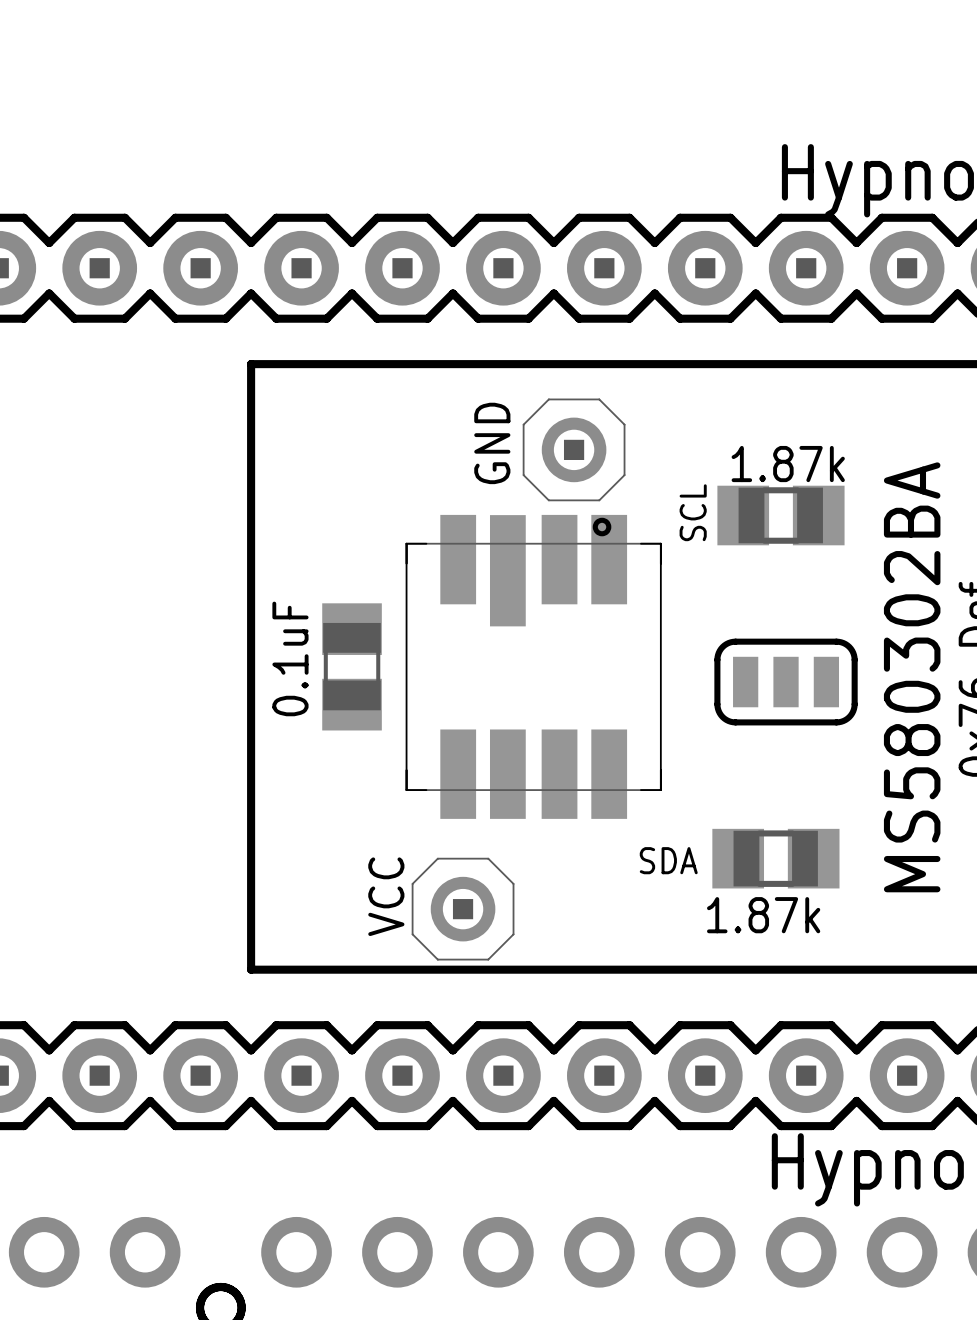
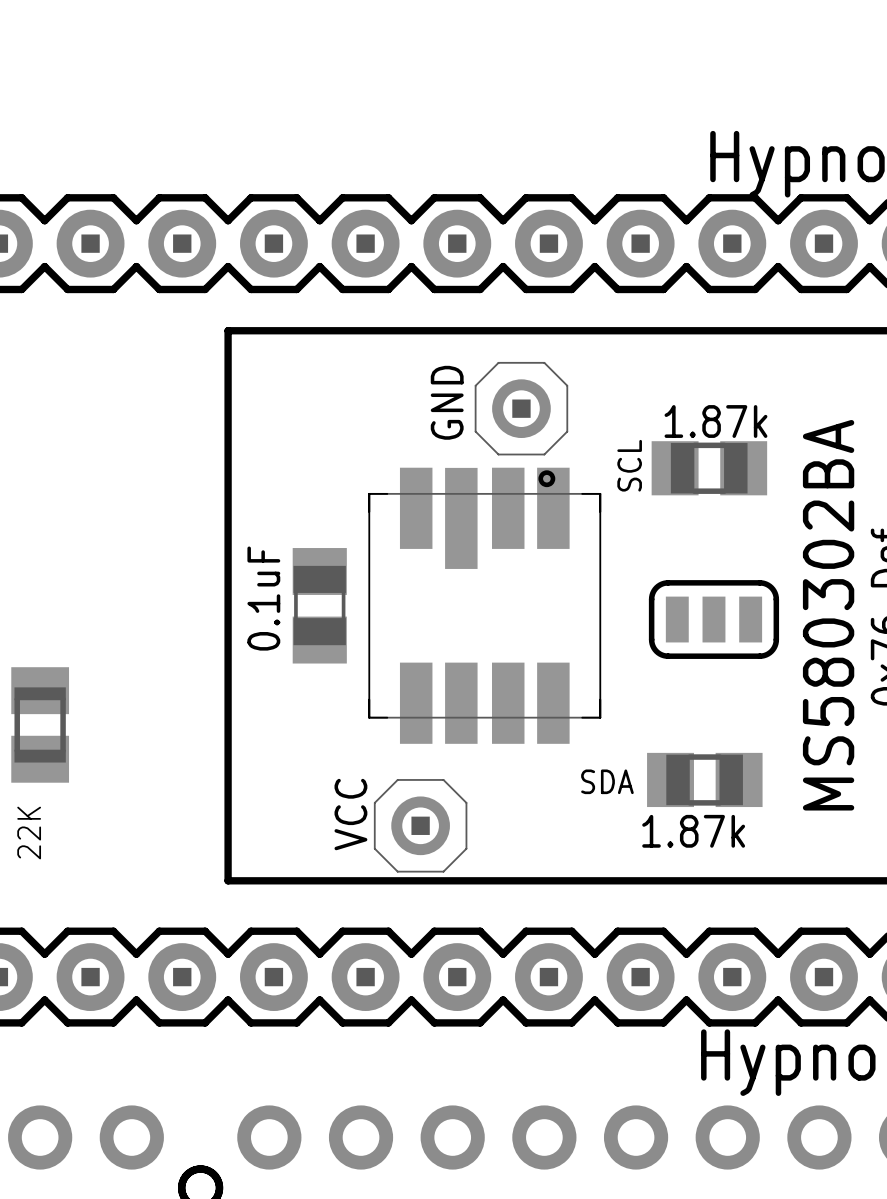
part: none -> (40, 724)
text: none -> 22K (29, 833)

